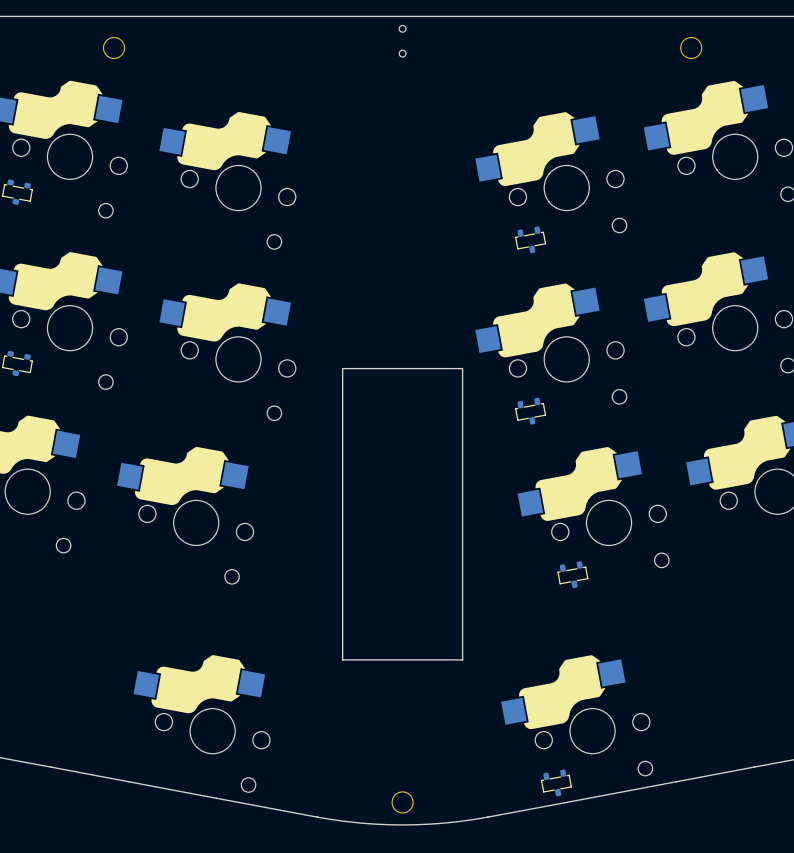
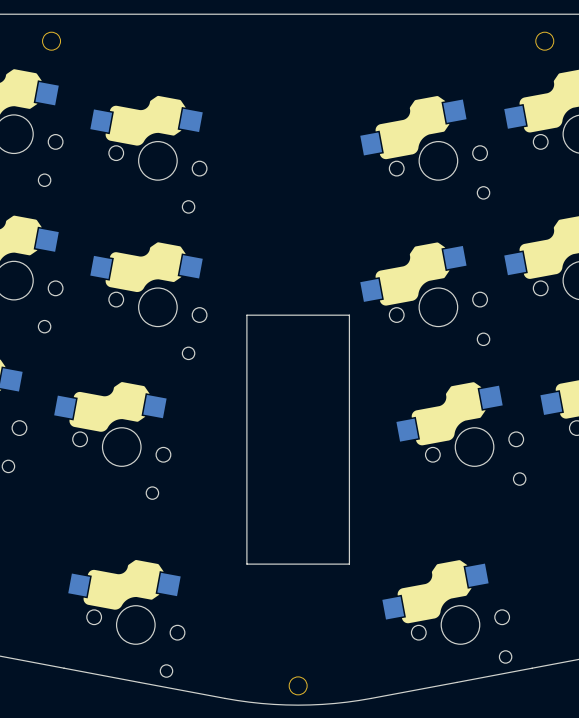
part: (402, 41) -> none
part: (530, 239) -> none
part: (530, 411) -> none
part: (572, 574) -> none
part: (556, 782) -> none

